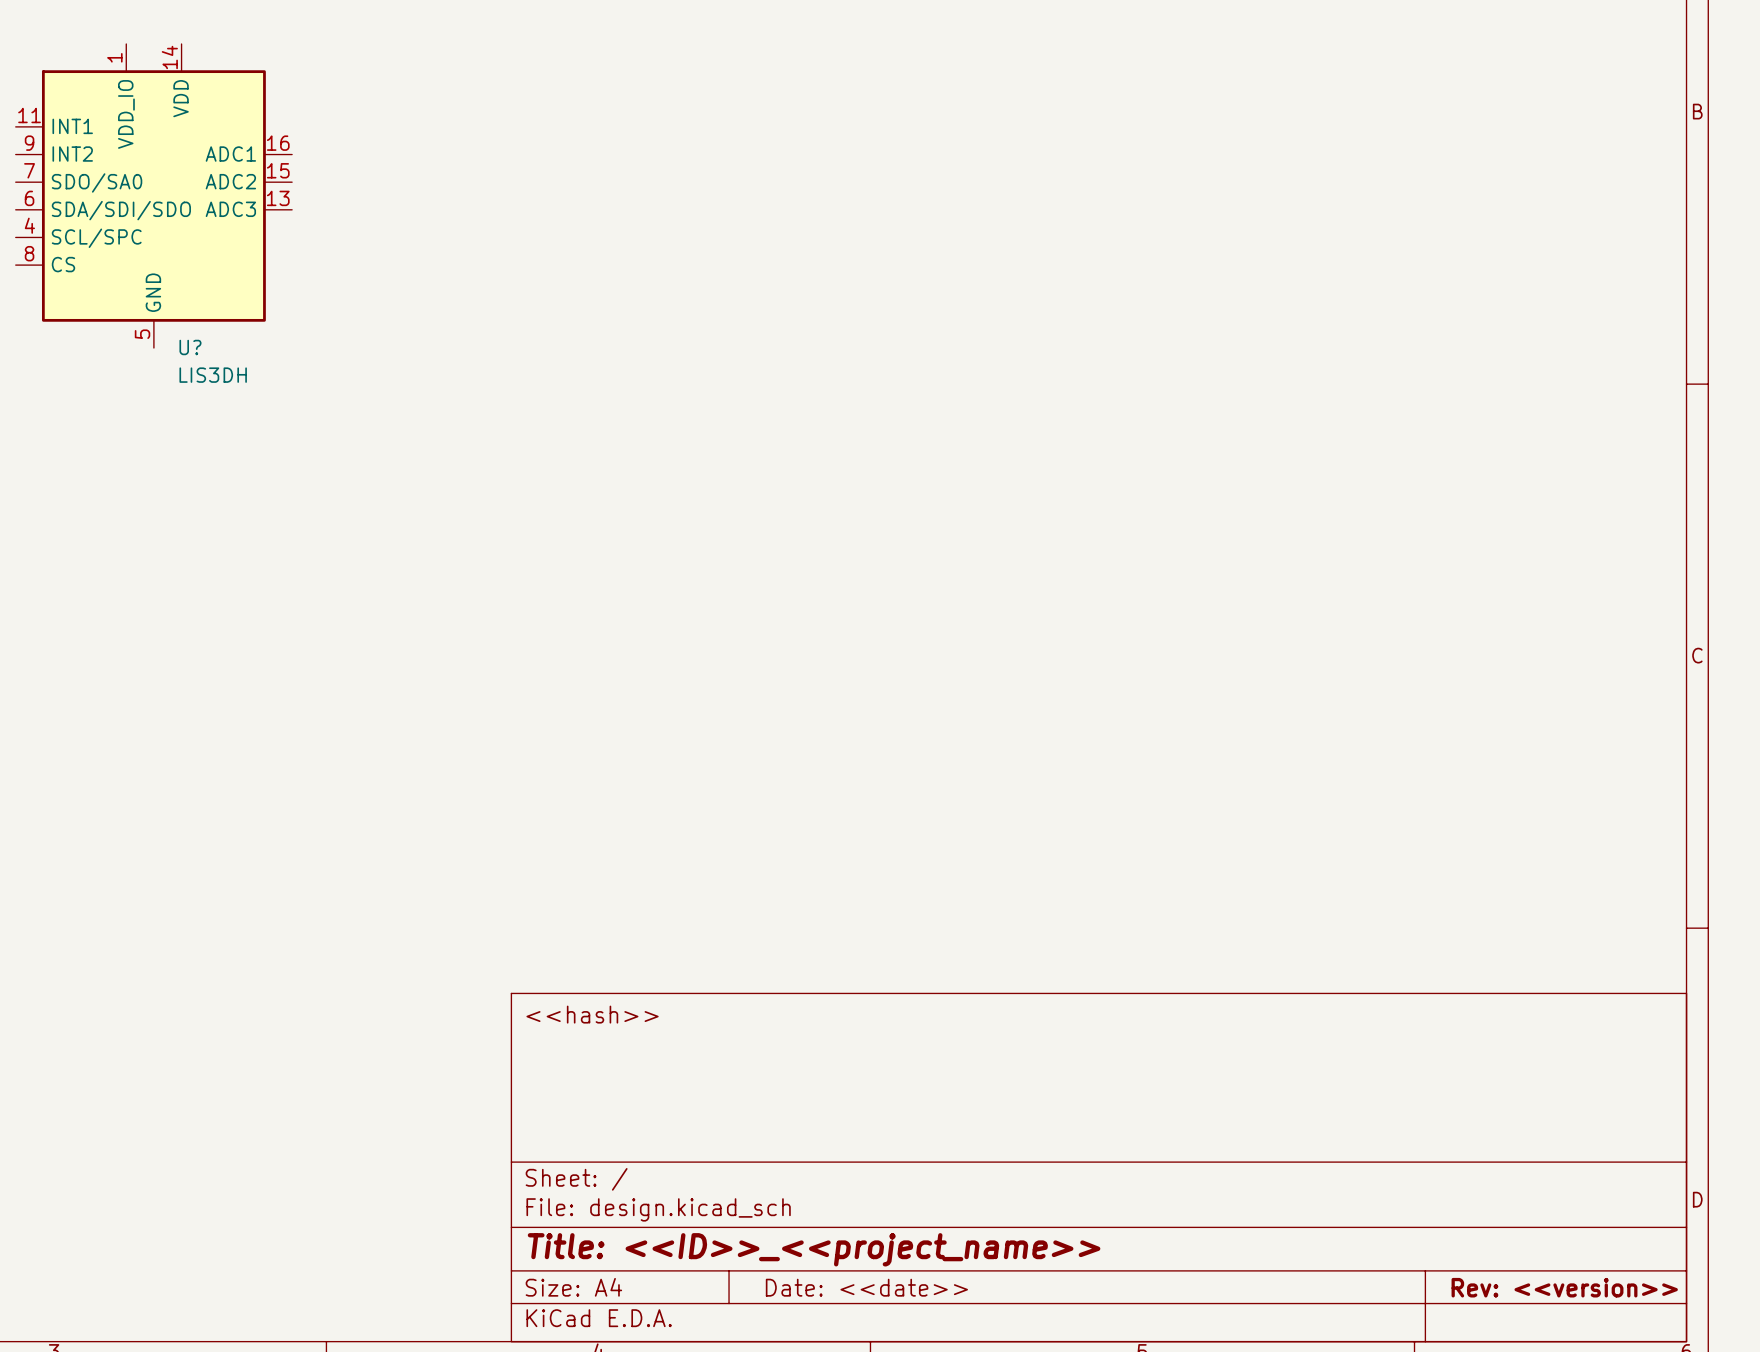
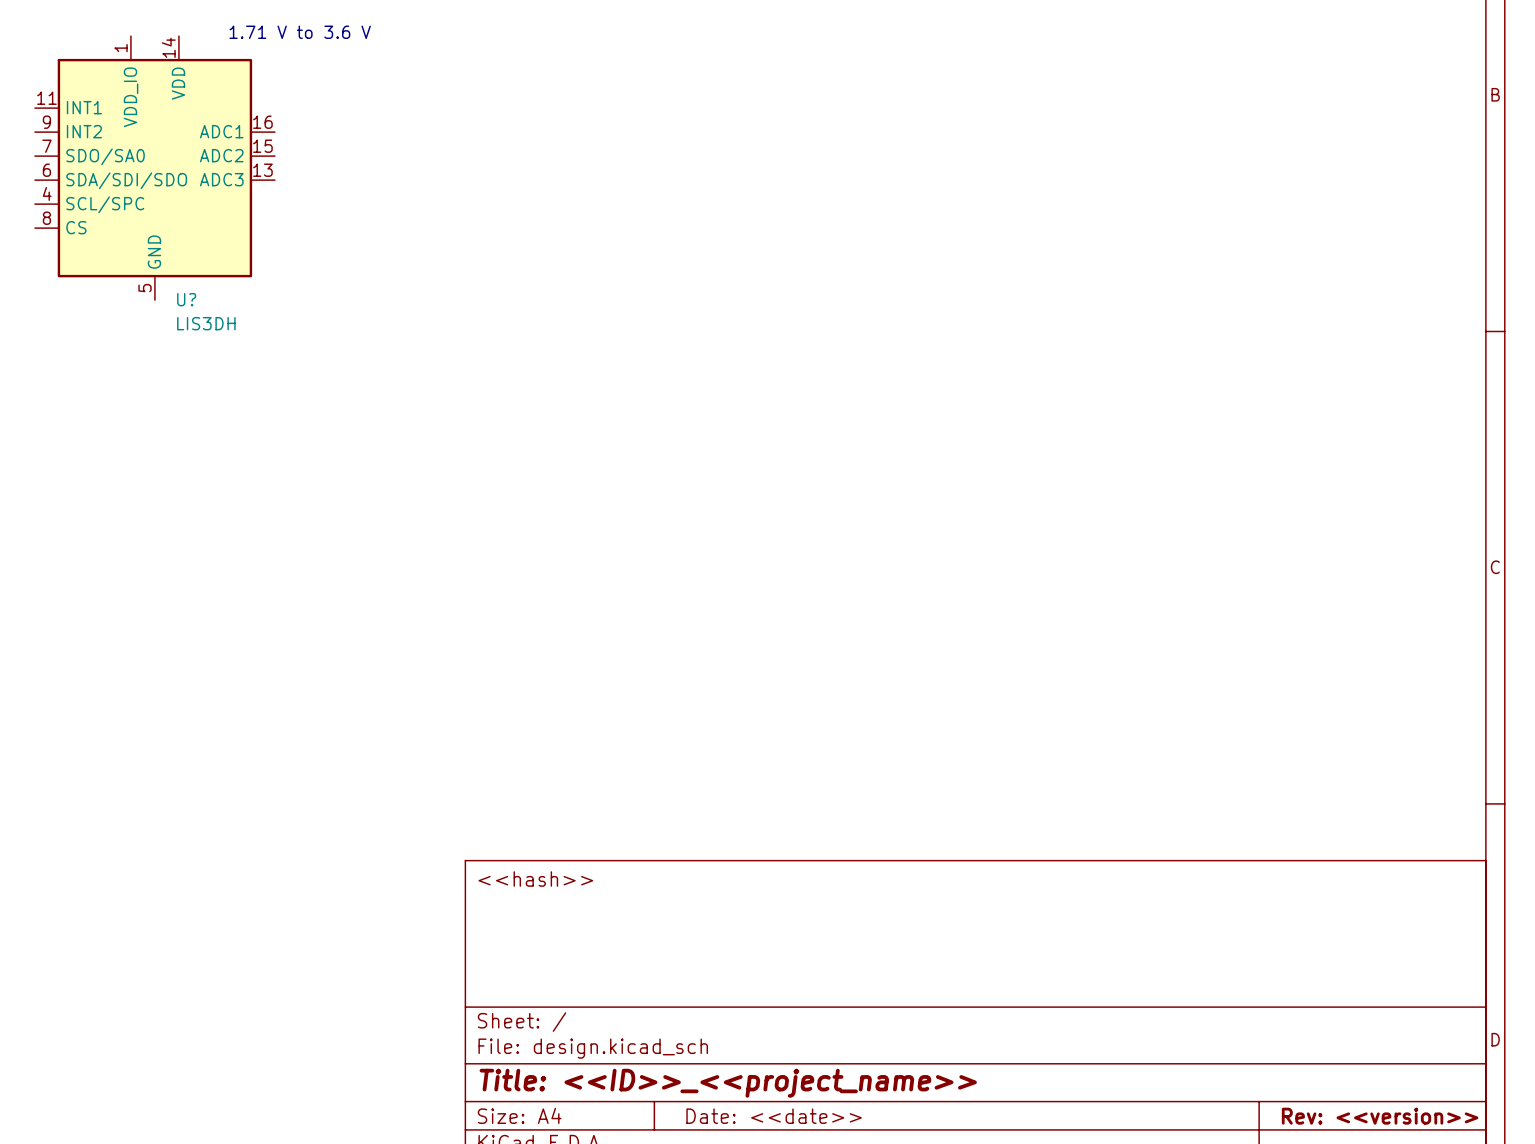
text: none -> 1.71 V to 3.6 V (300, 32)

